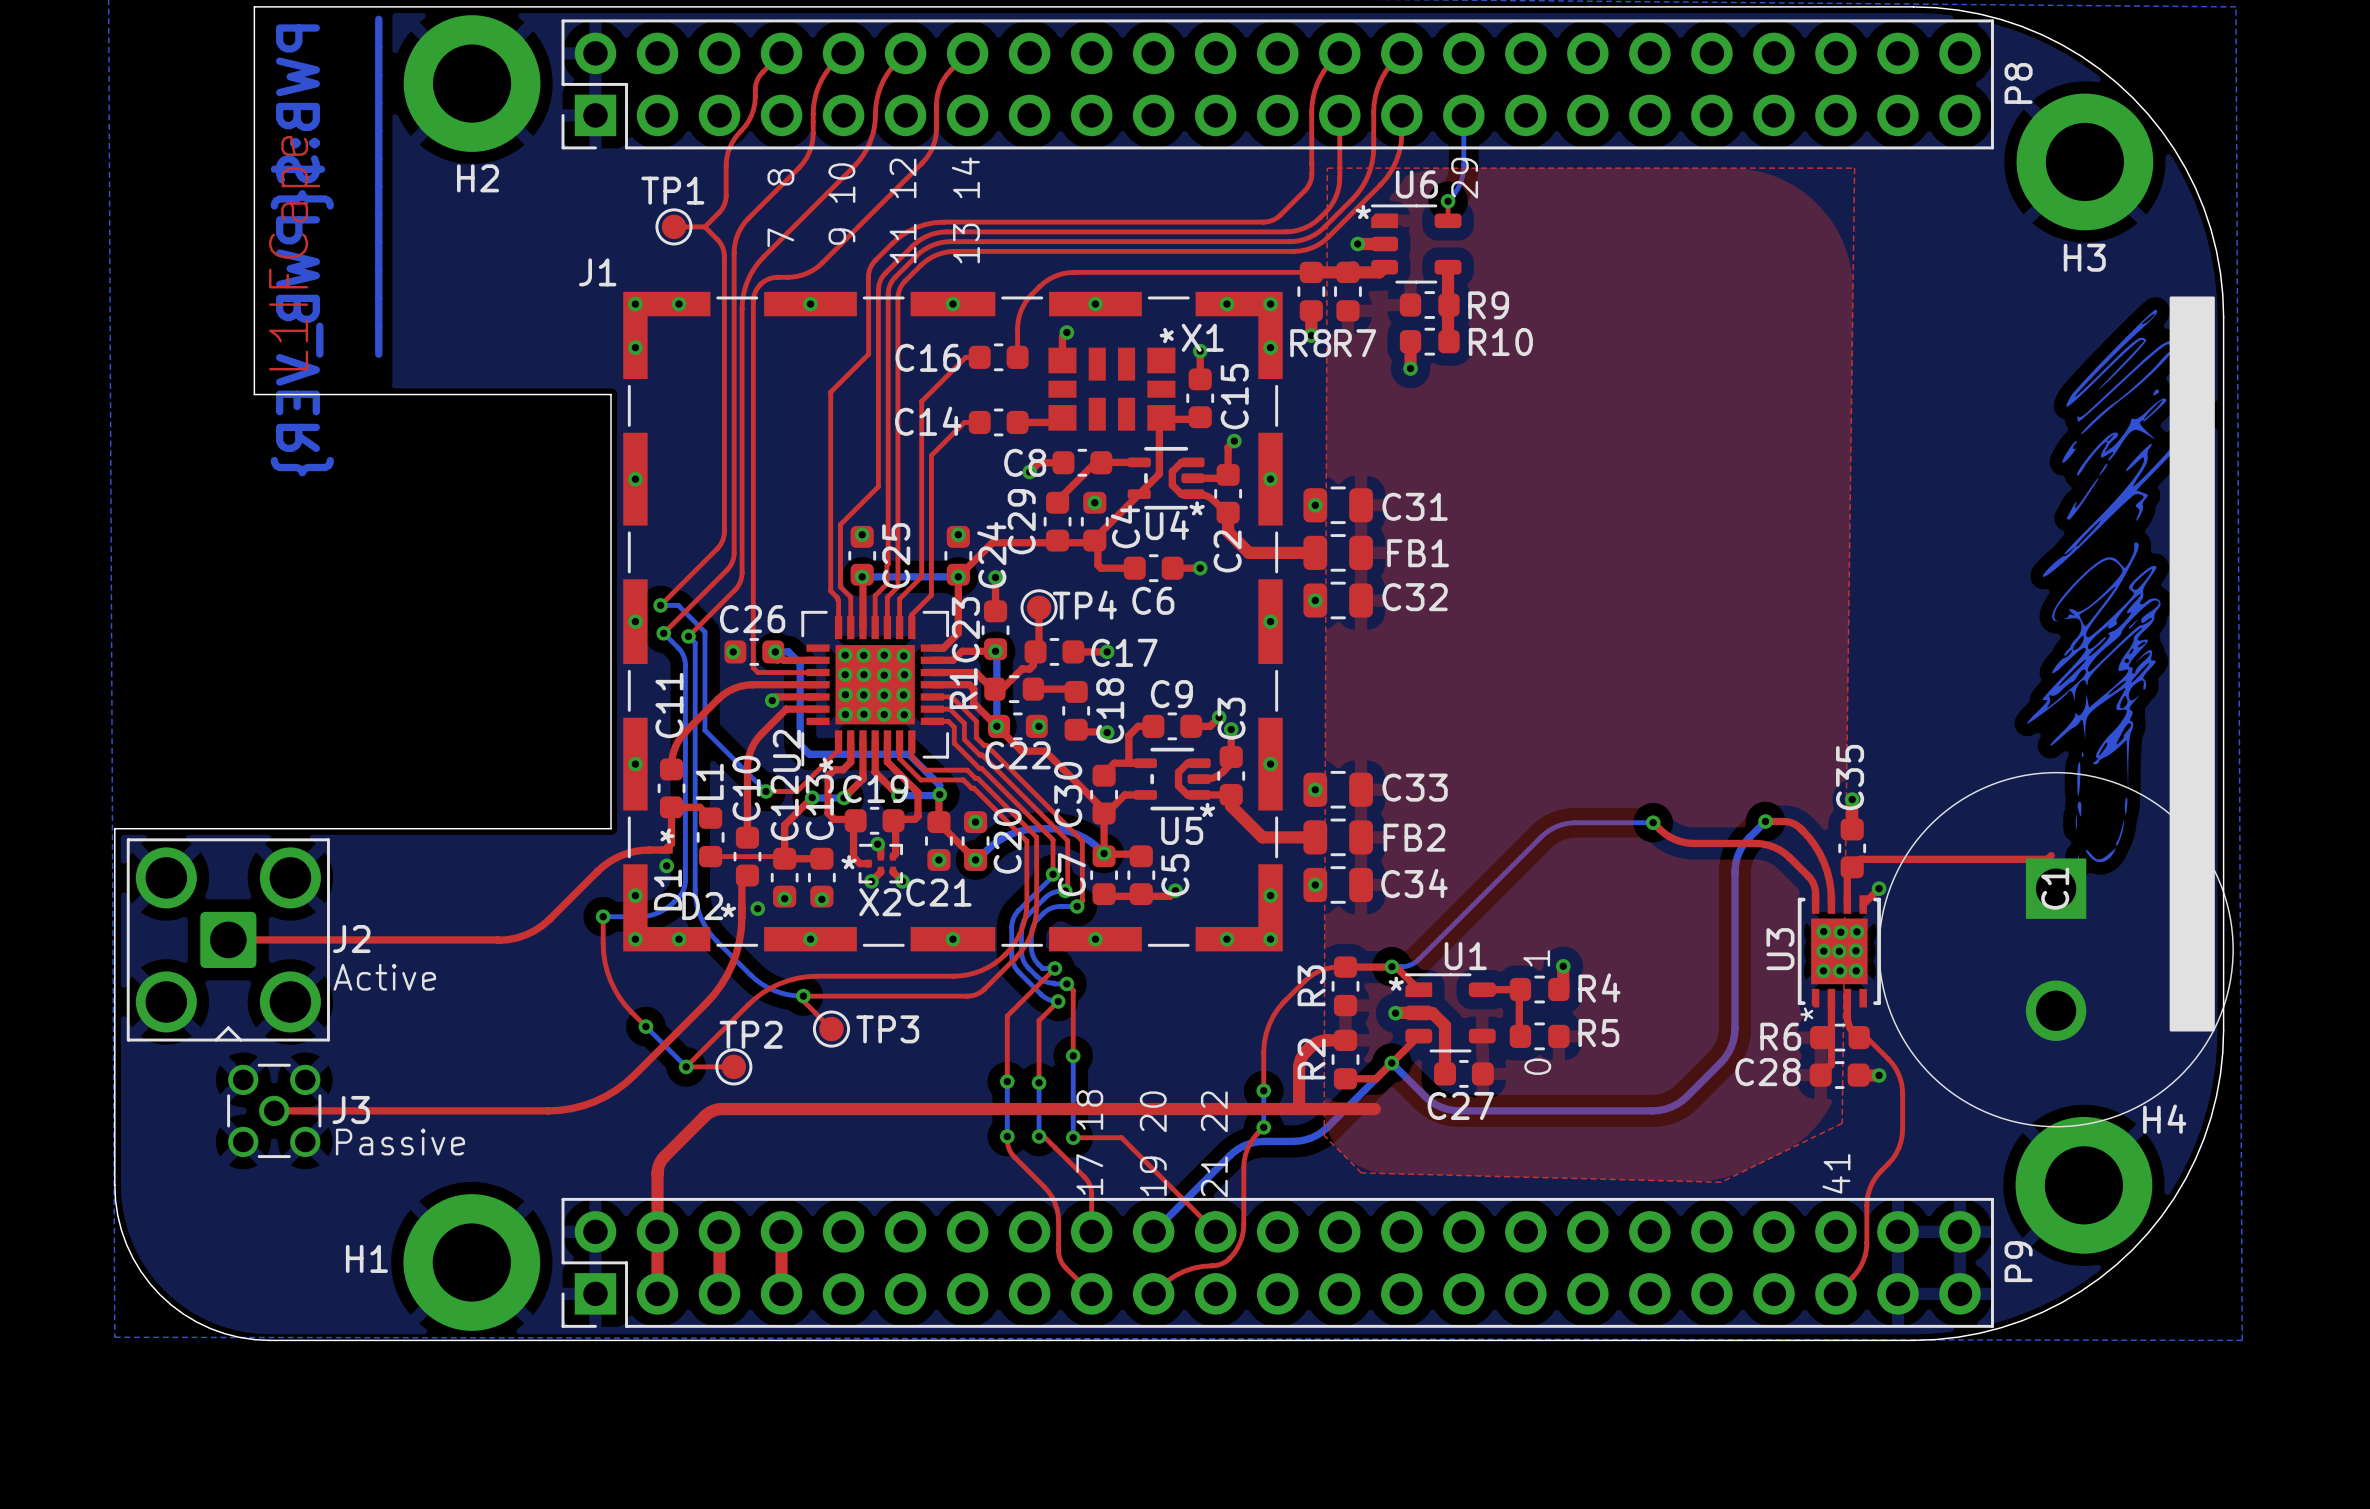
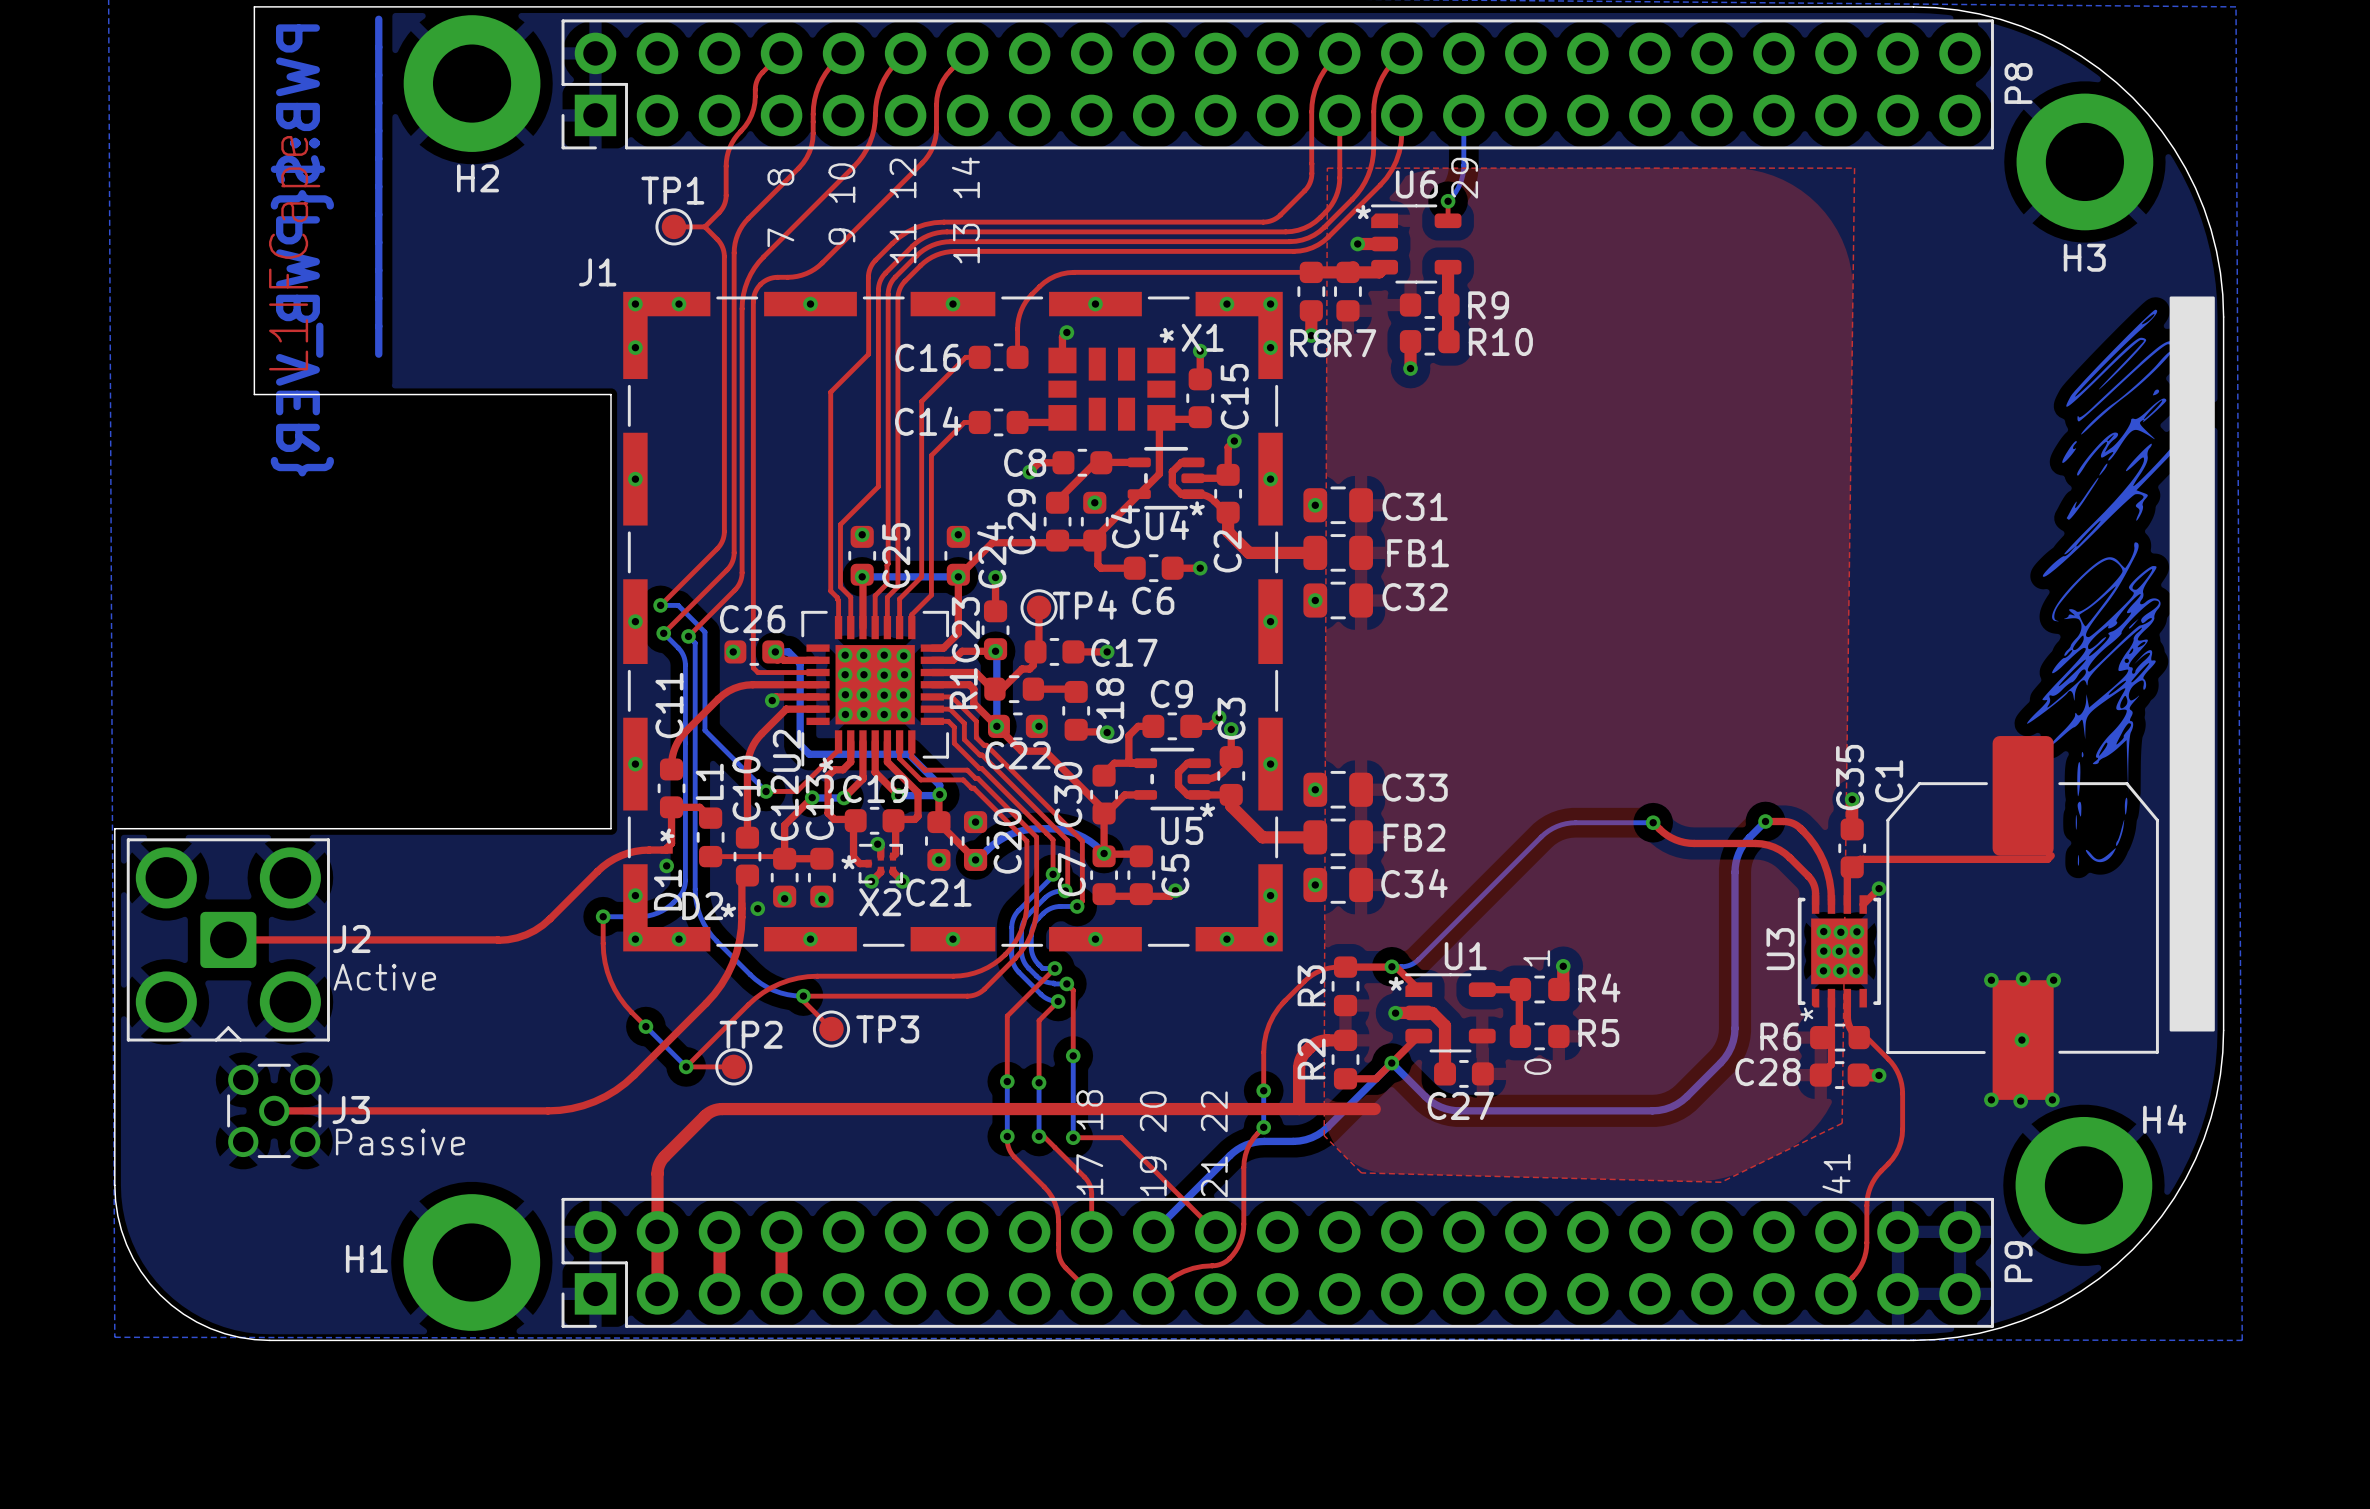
C1 footprint: [1878, 772, 2234, 1128] -> [1886, 736, 2159, 1100]
C1 name position: C1 (2055, 888) -> C1 (1889, 781)
via: none -> (2023, 979)
via: none -> (1991, 980)
via: none -> (2053, 980)
via: none -> (2021, 1040)
via: none -> (1991, 1099)
via: none -> (2052, 1099)
via: none -> (2020, 1101)

